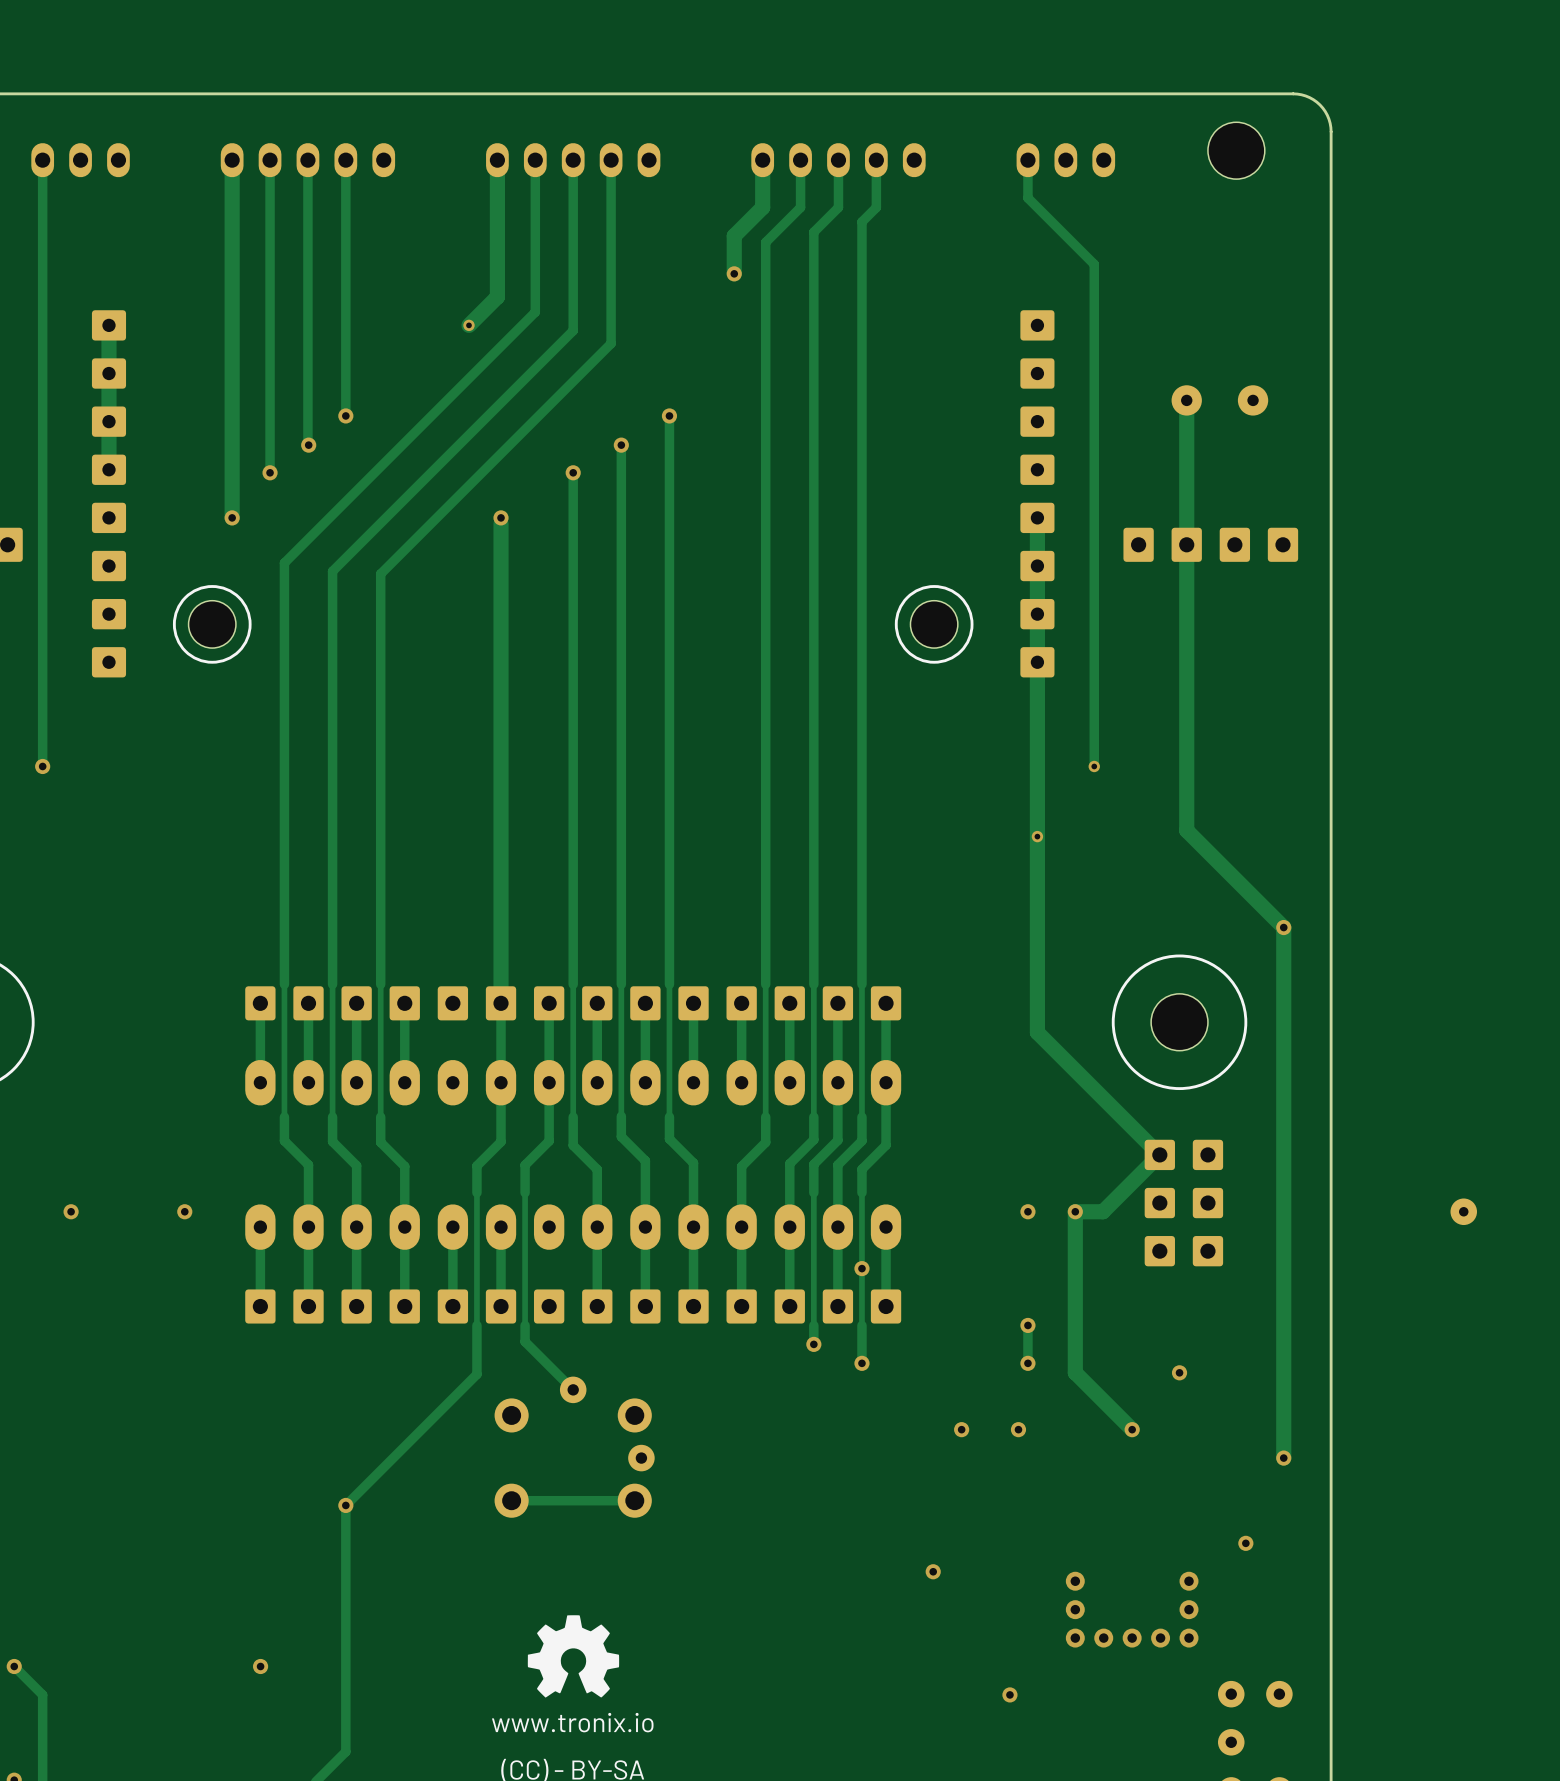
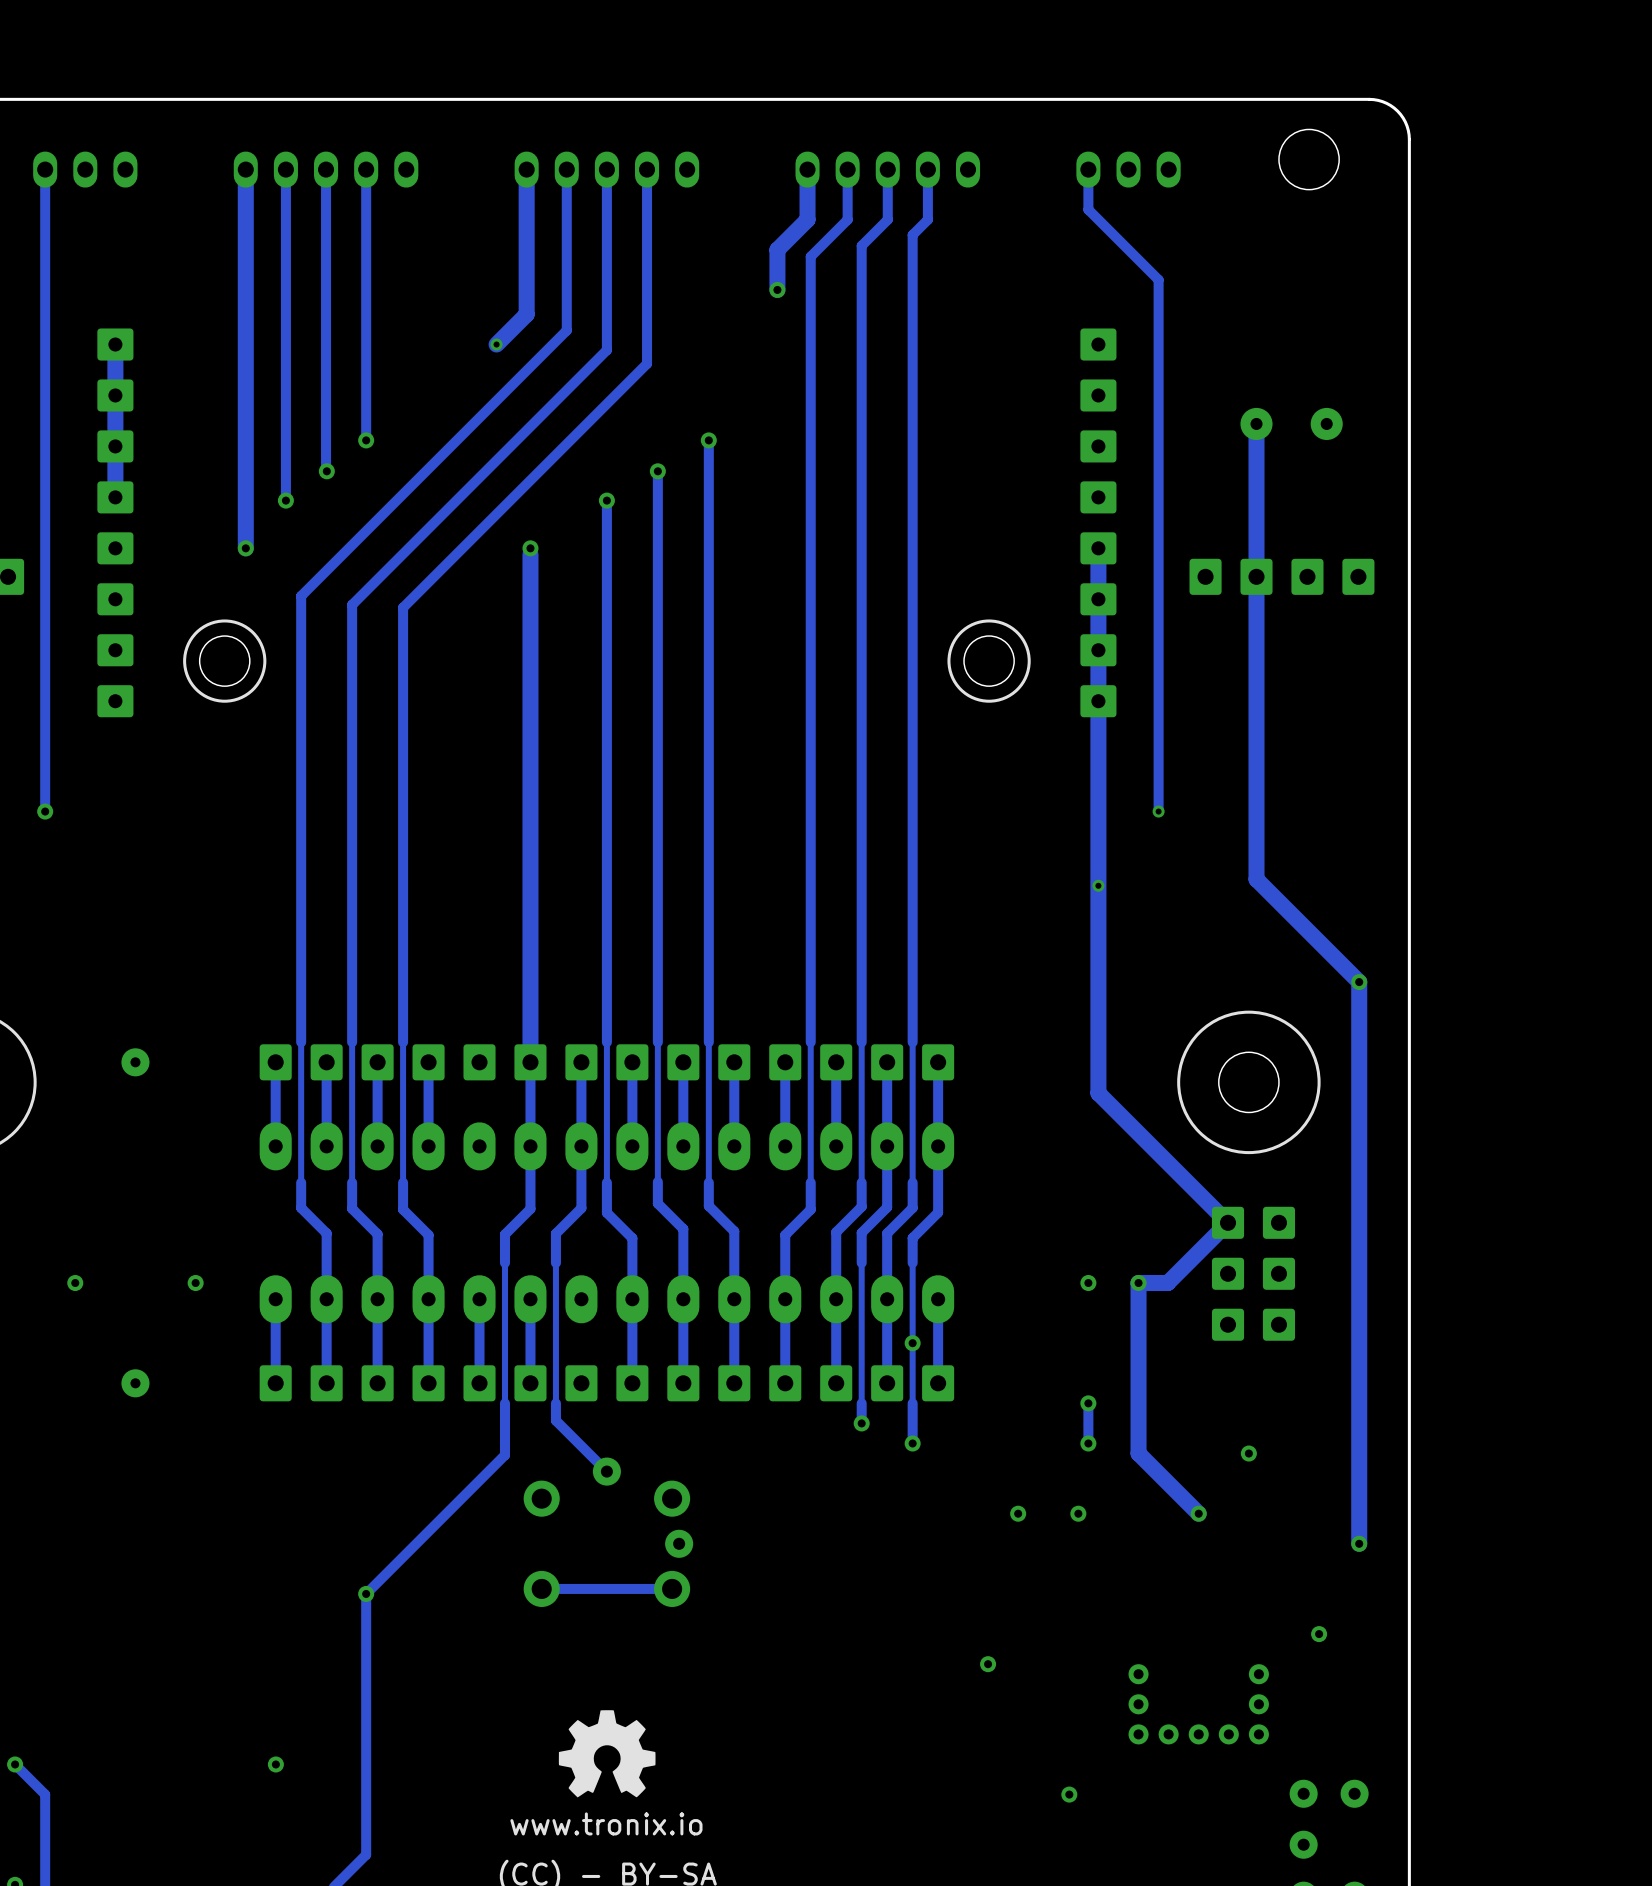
part: none -> (135, 1062)
part: (1463, 1211) -> none
part: none -> (135, 1383)

